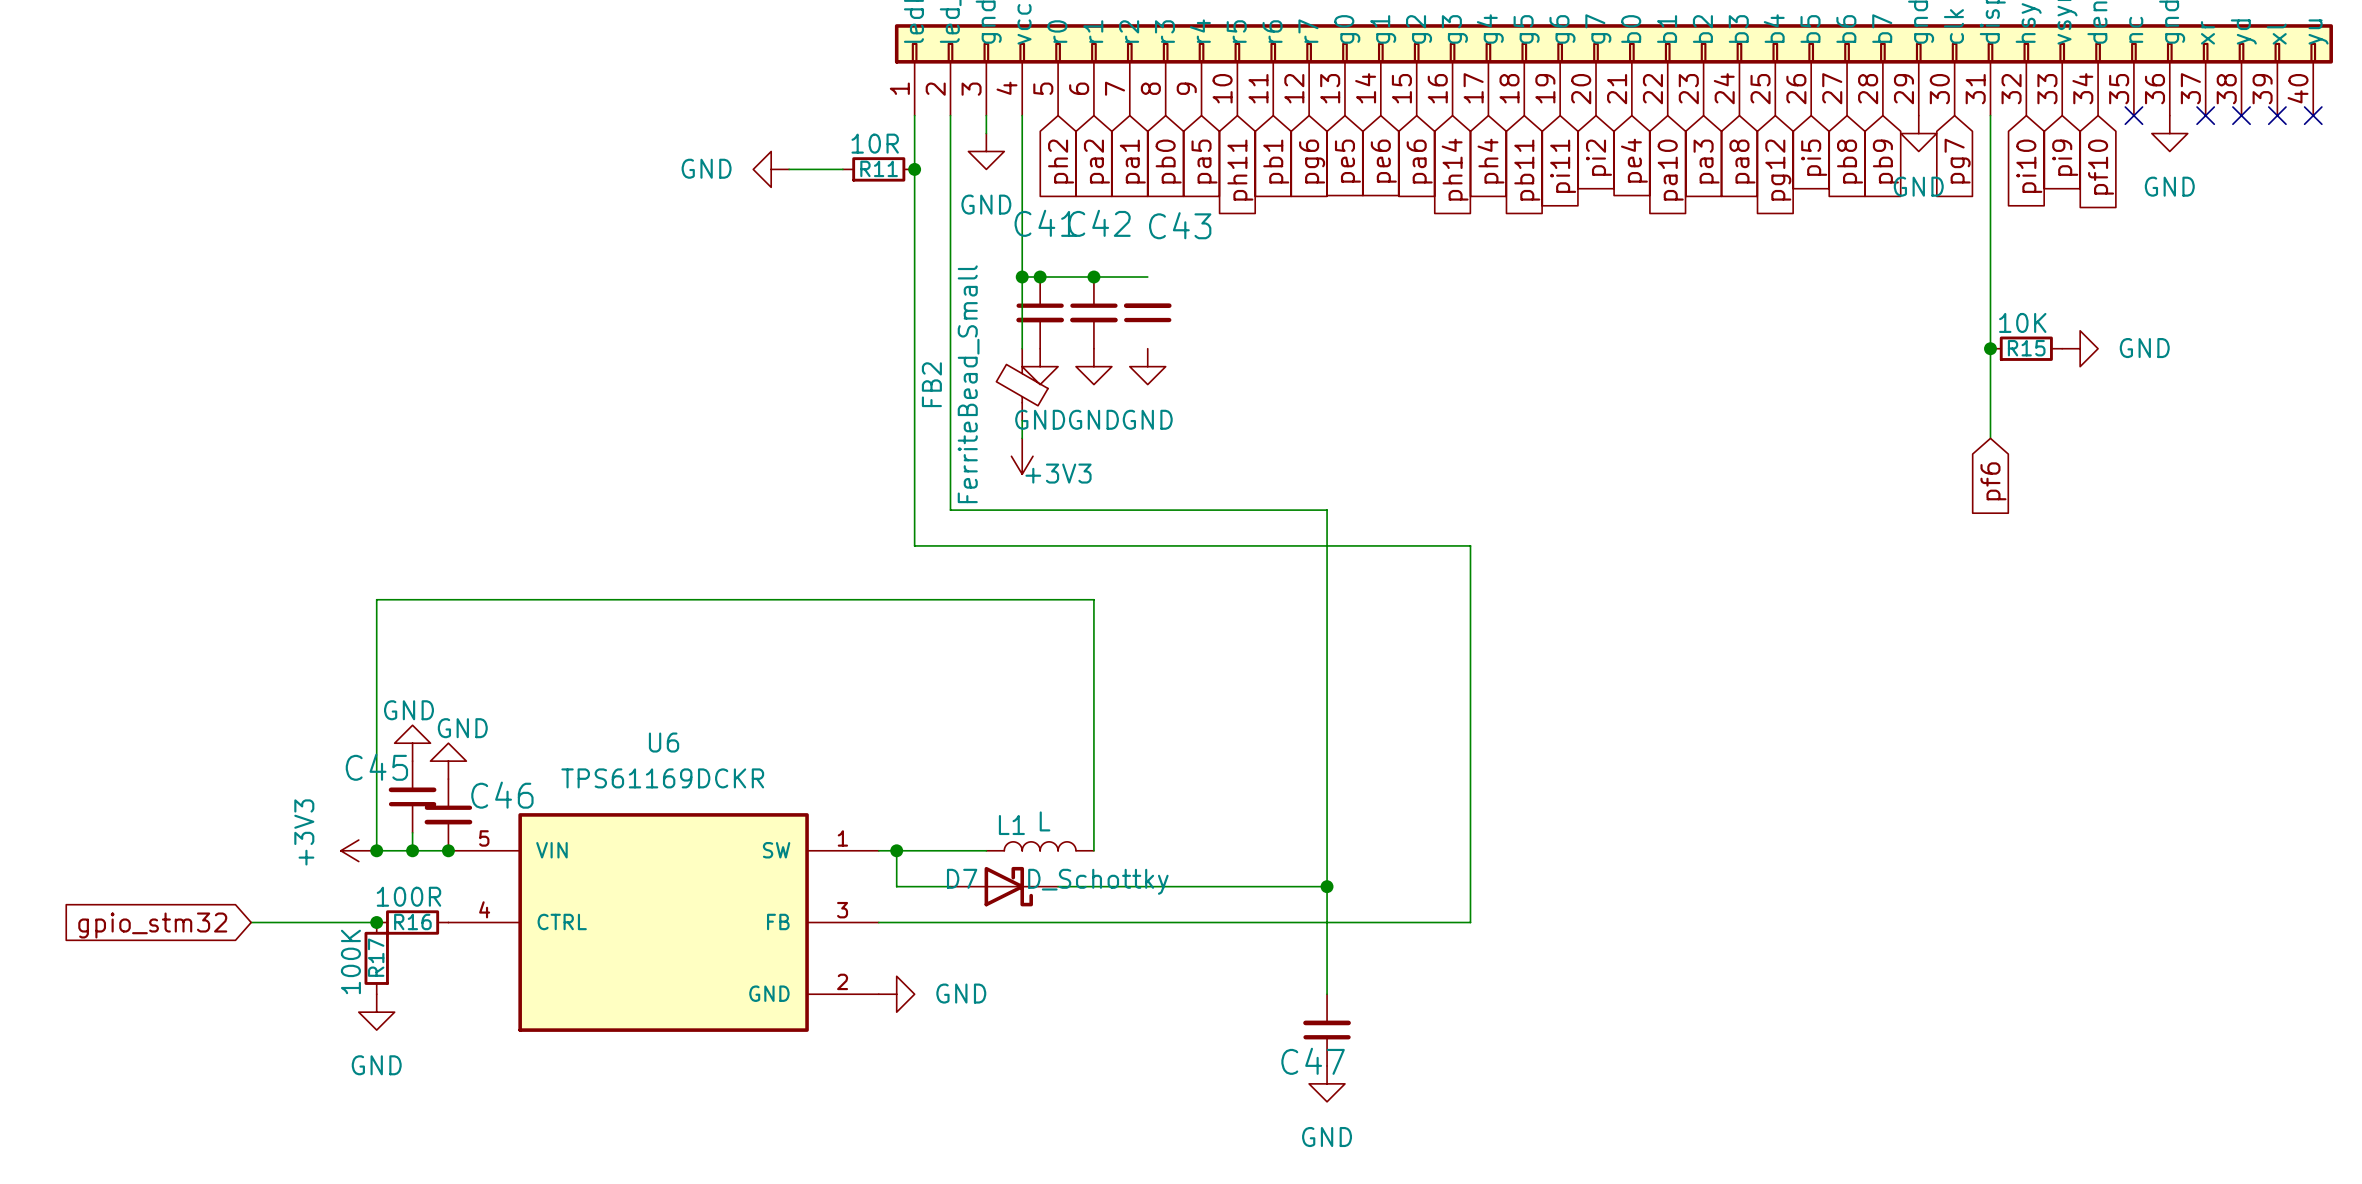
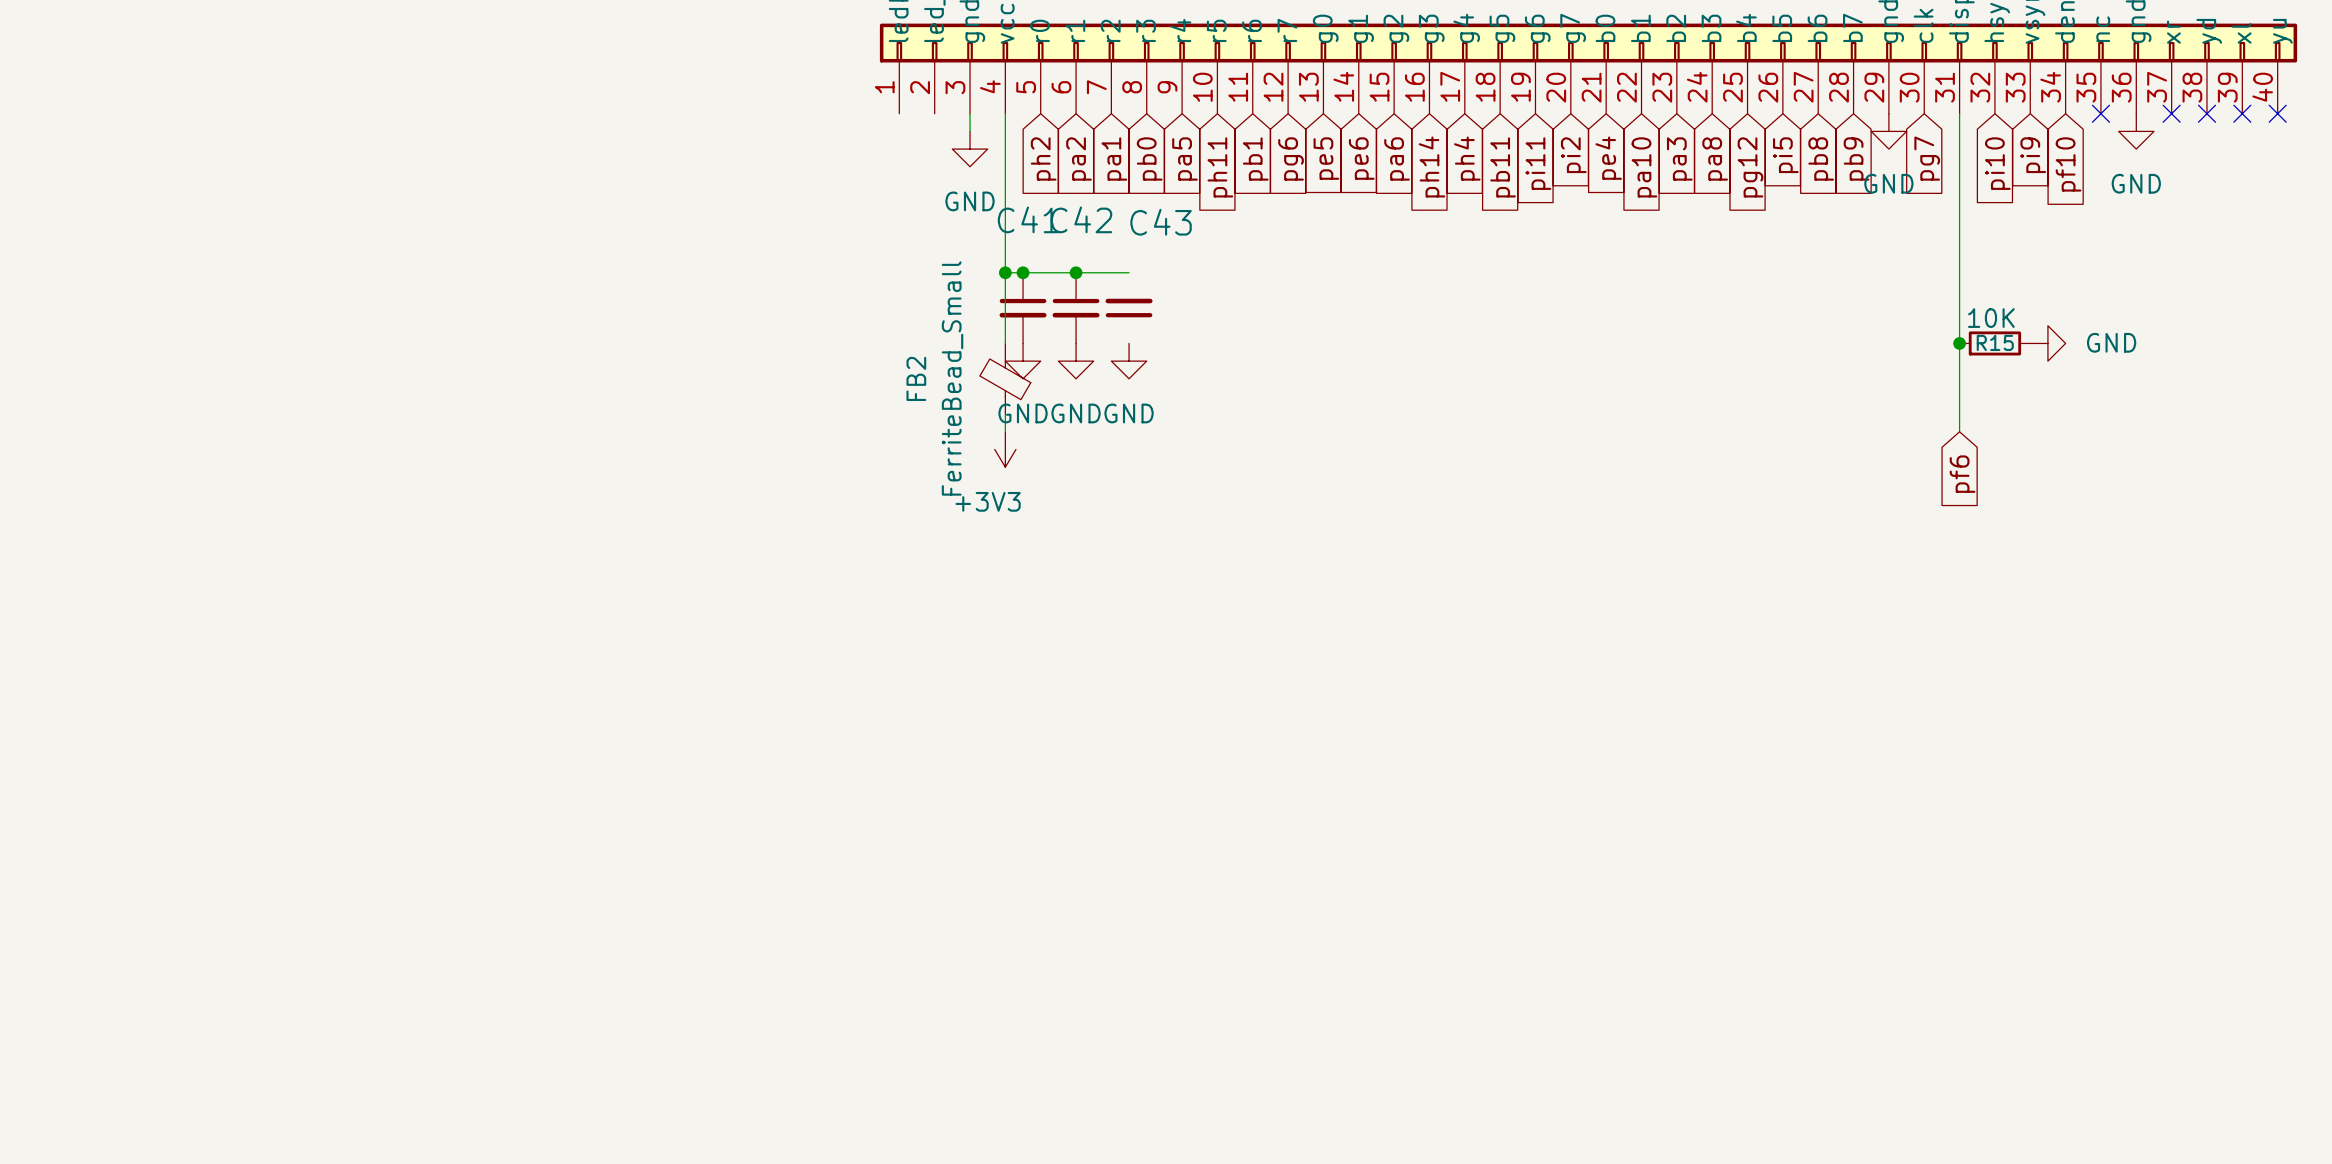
wire: (914, 115) (914, 545) (1470, 545) (1470, 922) (878, 922) -> none
wire: (950, 115) (950, 510) (1327, 510) (1327, 994) -> none
power symbol: GND (771, 169) -> none
wire: (789, 169) (842, 169) -> none
R11: 10R (878, 169) -> none
junction: (914, 169) -> none
power symbol text position: +3V3 (1058, 473) -> +3V3 (988, 501)
power symbol: GND (412, 743) -> none
power symbol: GND (448, 761) -> none
C45: (412, 796) -> none
C46: (448, 814) -> none
wire: (412, 832) (412, 850) -> none
L1: L (1040, 846) -> none
power symbol: +3V3 (358, 850) -> none
junction: (376, 850) -> none
junction: (412, 850) -> none
wire: (448, 850) (376, 850) (376, 599) (1093, 599) (1093, 850) -> none
junction: (448, 850) -> none
wire: (878, 850) (986, 850) -> none
wire: (896, 850) (896, 886) (950, 886) -> none
junction: (896, 850) -> none
D7: D_Schottky (1004, 886) -> none
wire: (1058, 886) (1327, 886) -> none
junction: (1327, 886) -> none
wire: (251, 922) (376, 922) -> none
junction: (376, 922) -> none
R16: 100R (412, 922) -> none
U6: TPS61169DCKR (663, 922) -> none
global label: gpio_stm32 (152, 925) -> none
R17: 100K (376, 958) -> none
power symbol: GND (896, 994) -> none
power symbol: GND (376, 1012) -> none
C47: (1327, 1030) -> none
power symbol: GND (1327, 1083) -> none

